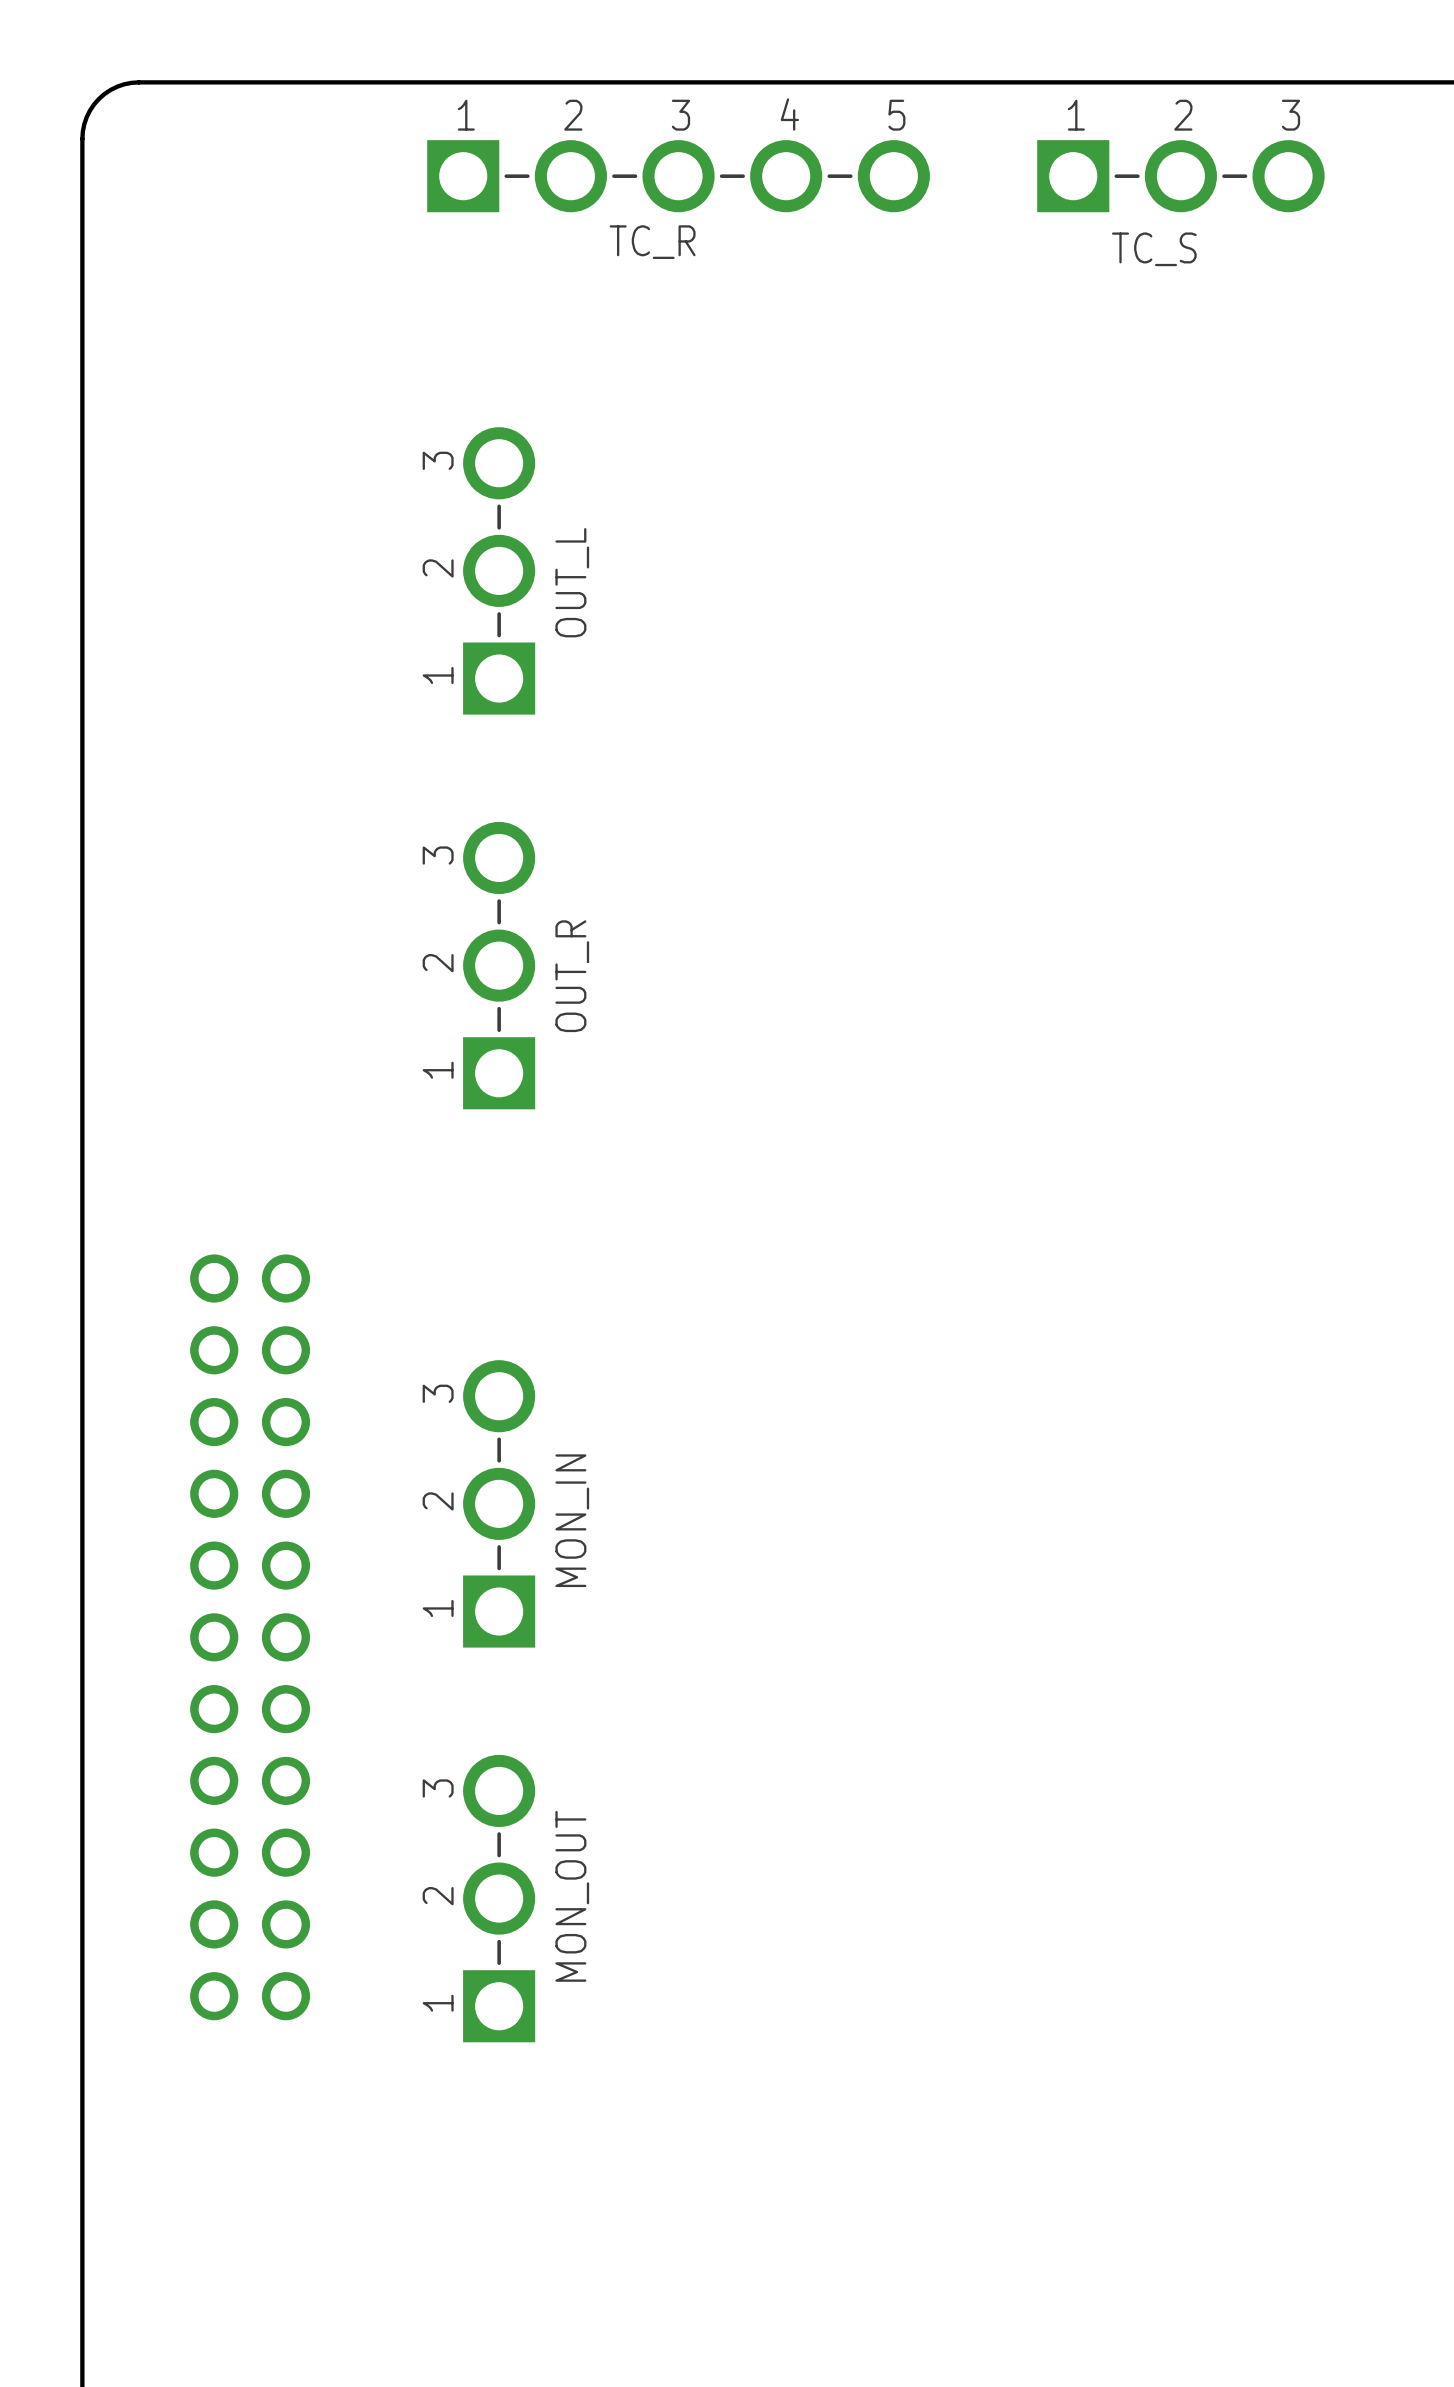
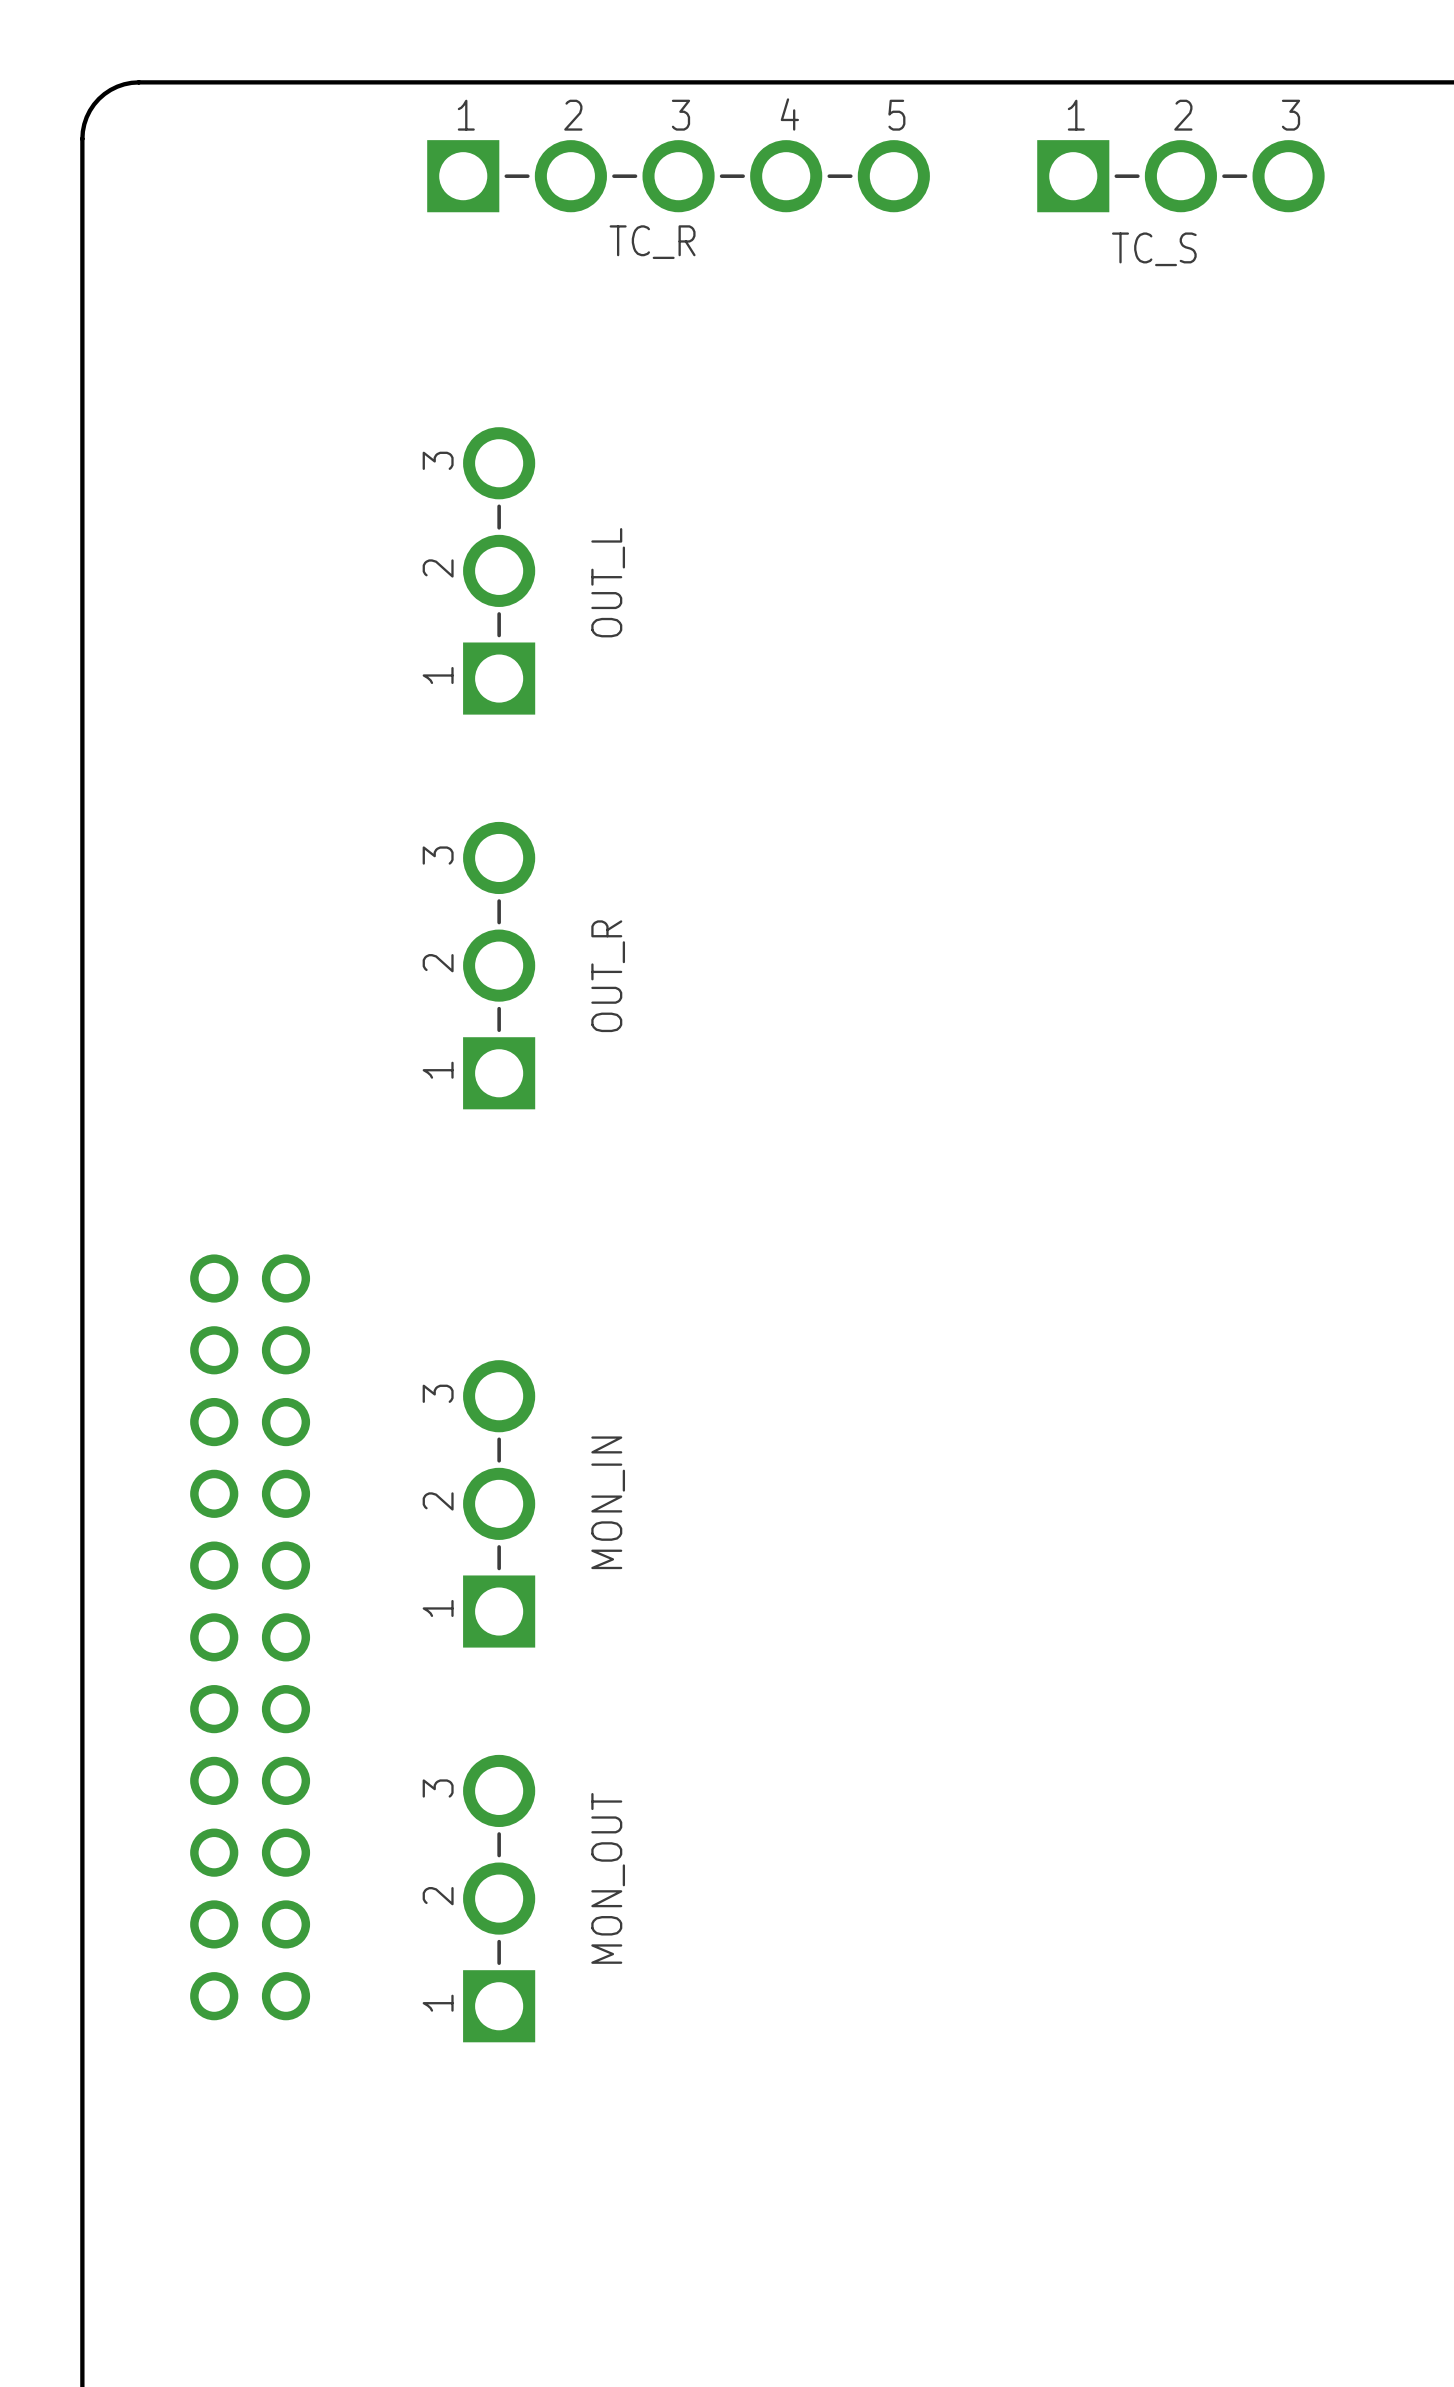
OUT_L name position: OUT_L (572, 582) -> OUT_L (608, 582)
OUT_R name position: OUT_R (572, 976) -> OUT_R (608, 976)
MON_IN name position: MON_IN (572, 1520) -> MON_IN (608, 1502)
MON_OUT name position: MON_OUT (572, 1896) -> MON_OUT (608, 1878)

